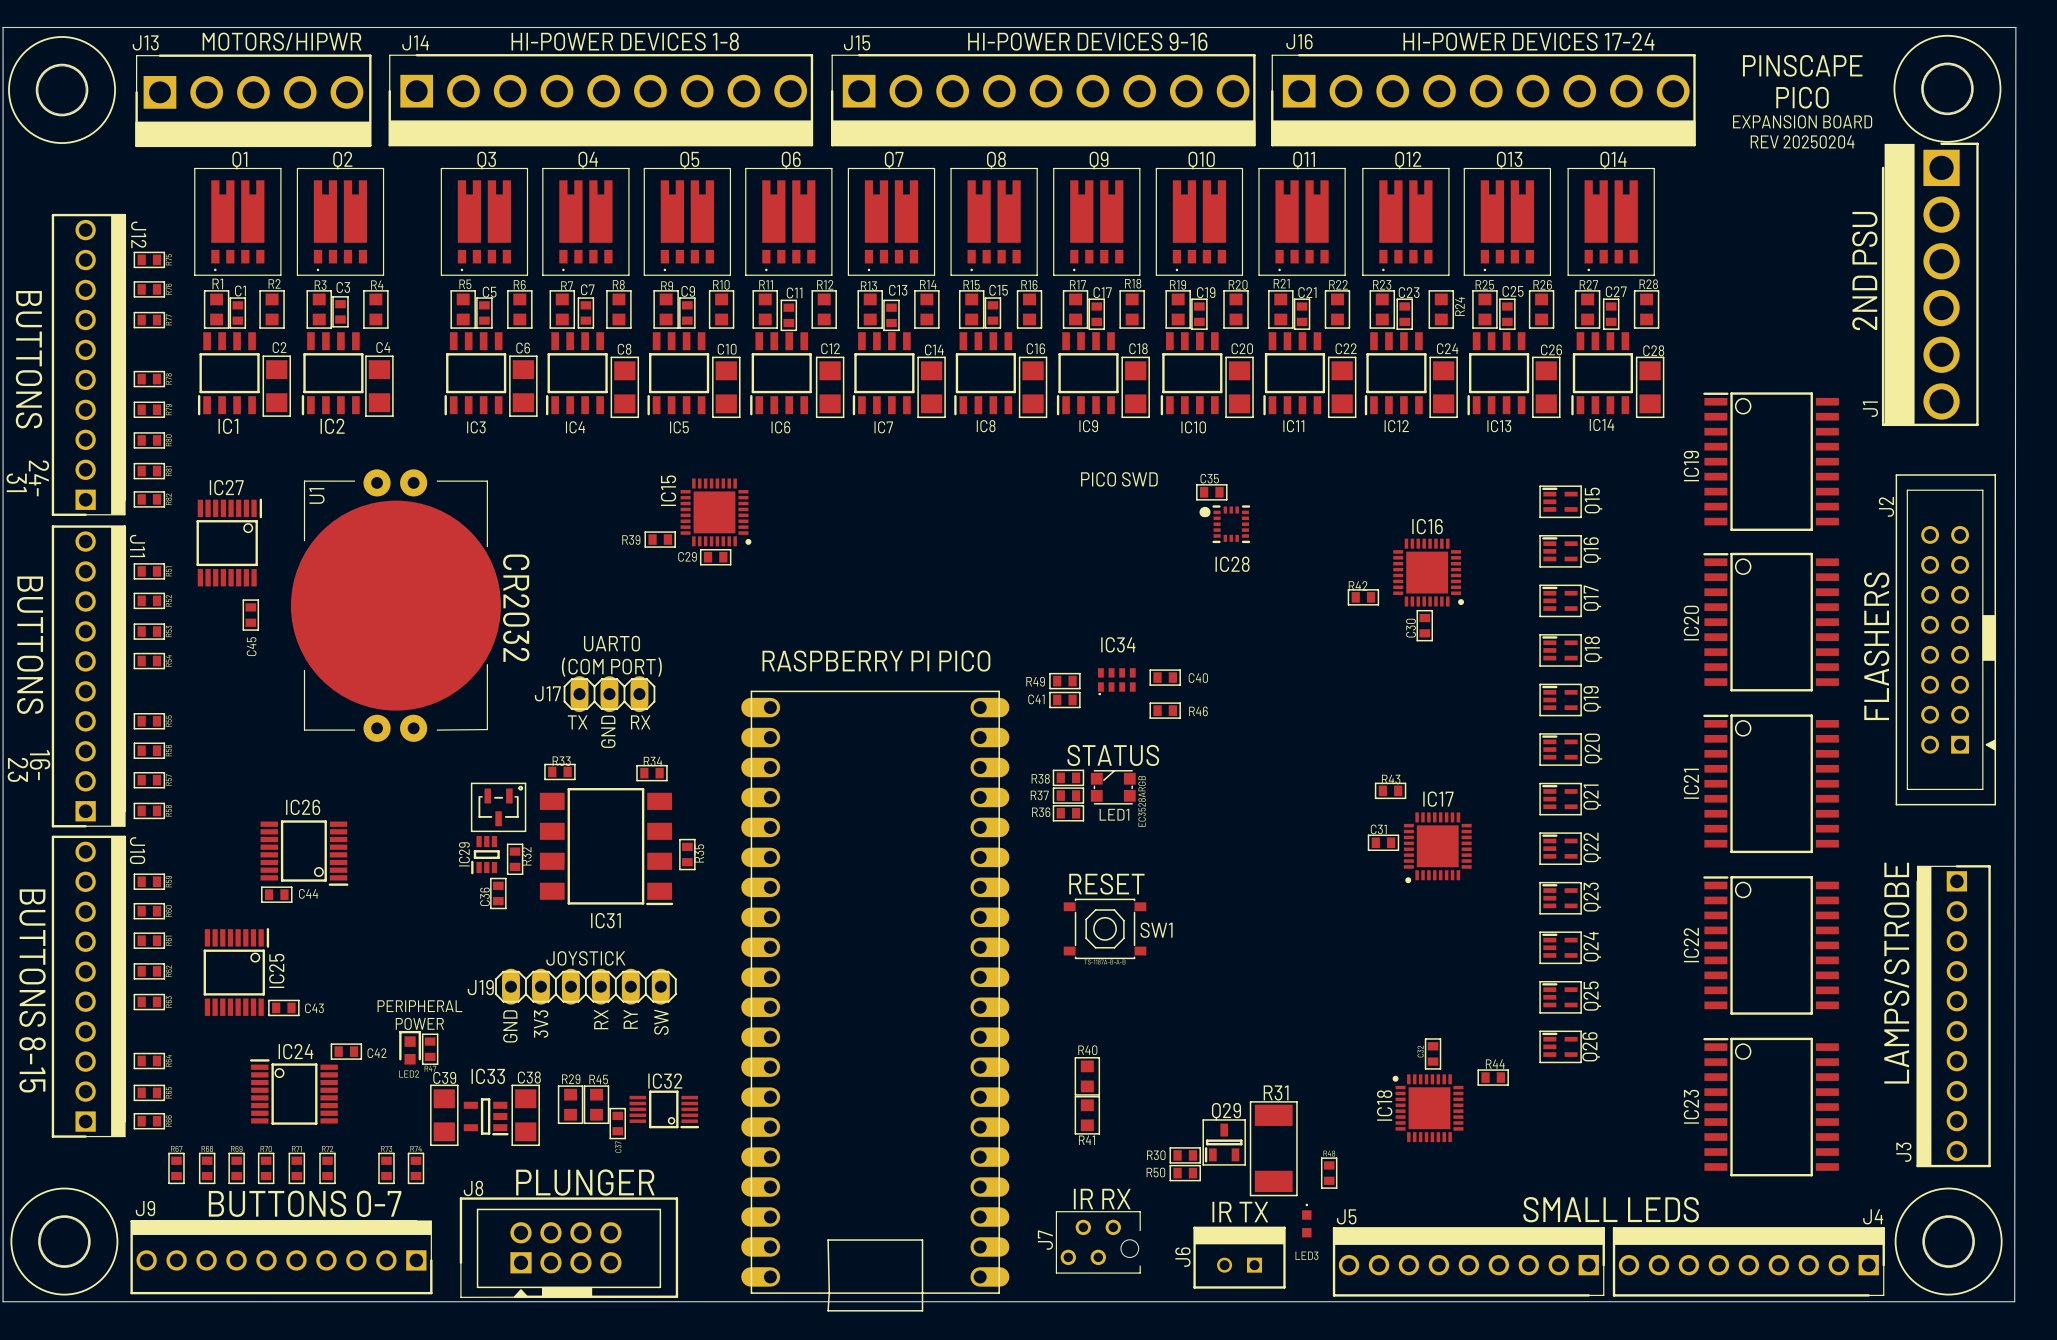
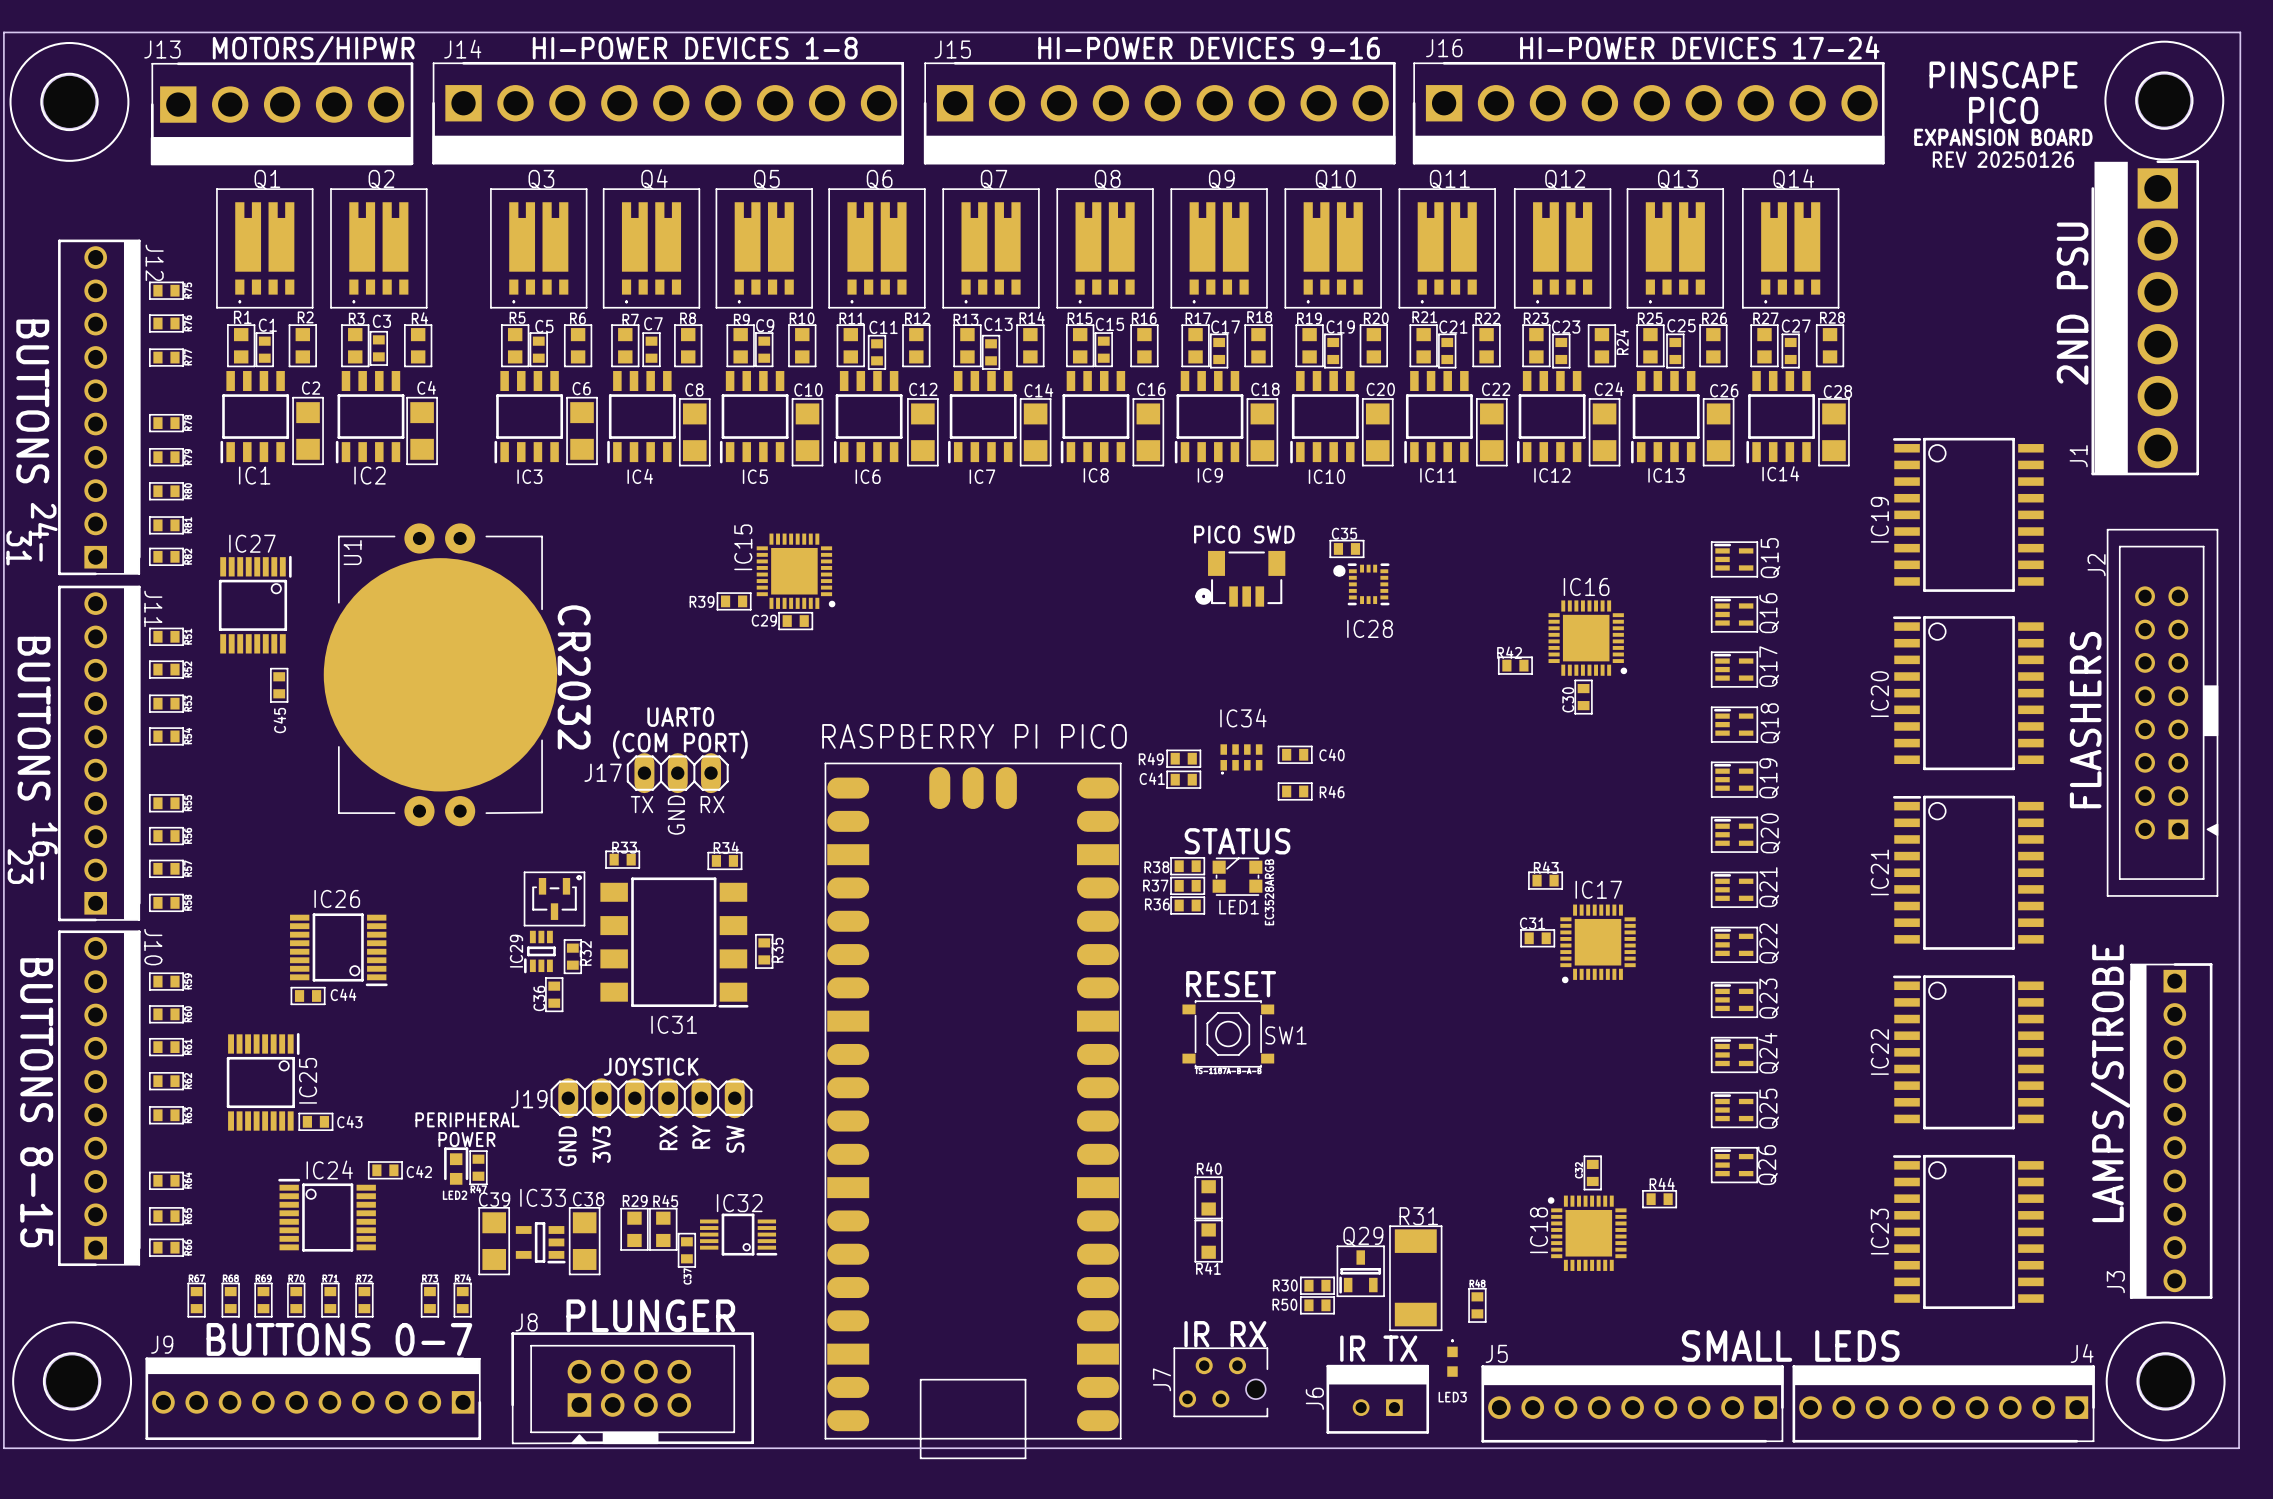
text: REV 20250204 (1802, 141) -> REV 20250126 (2003, 159)
part: none -> (1240, 578)
part footprint: [741, 690, 1010, 1312] -> [824, 762, 1122, 1460]

